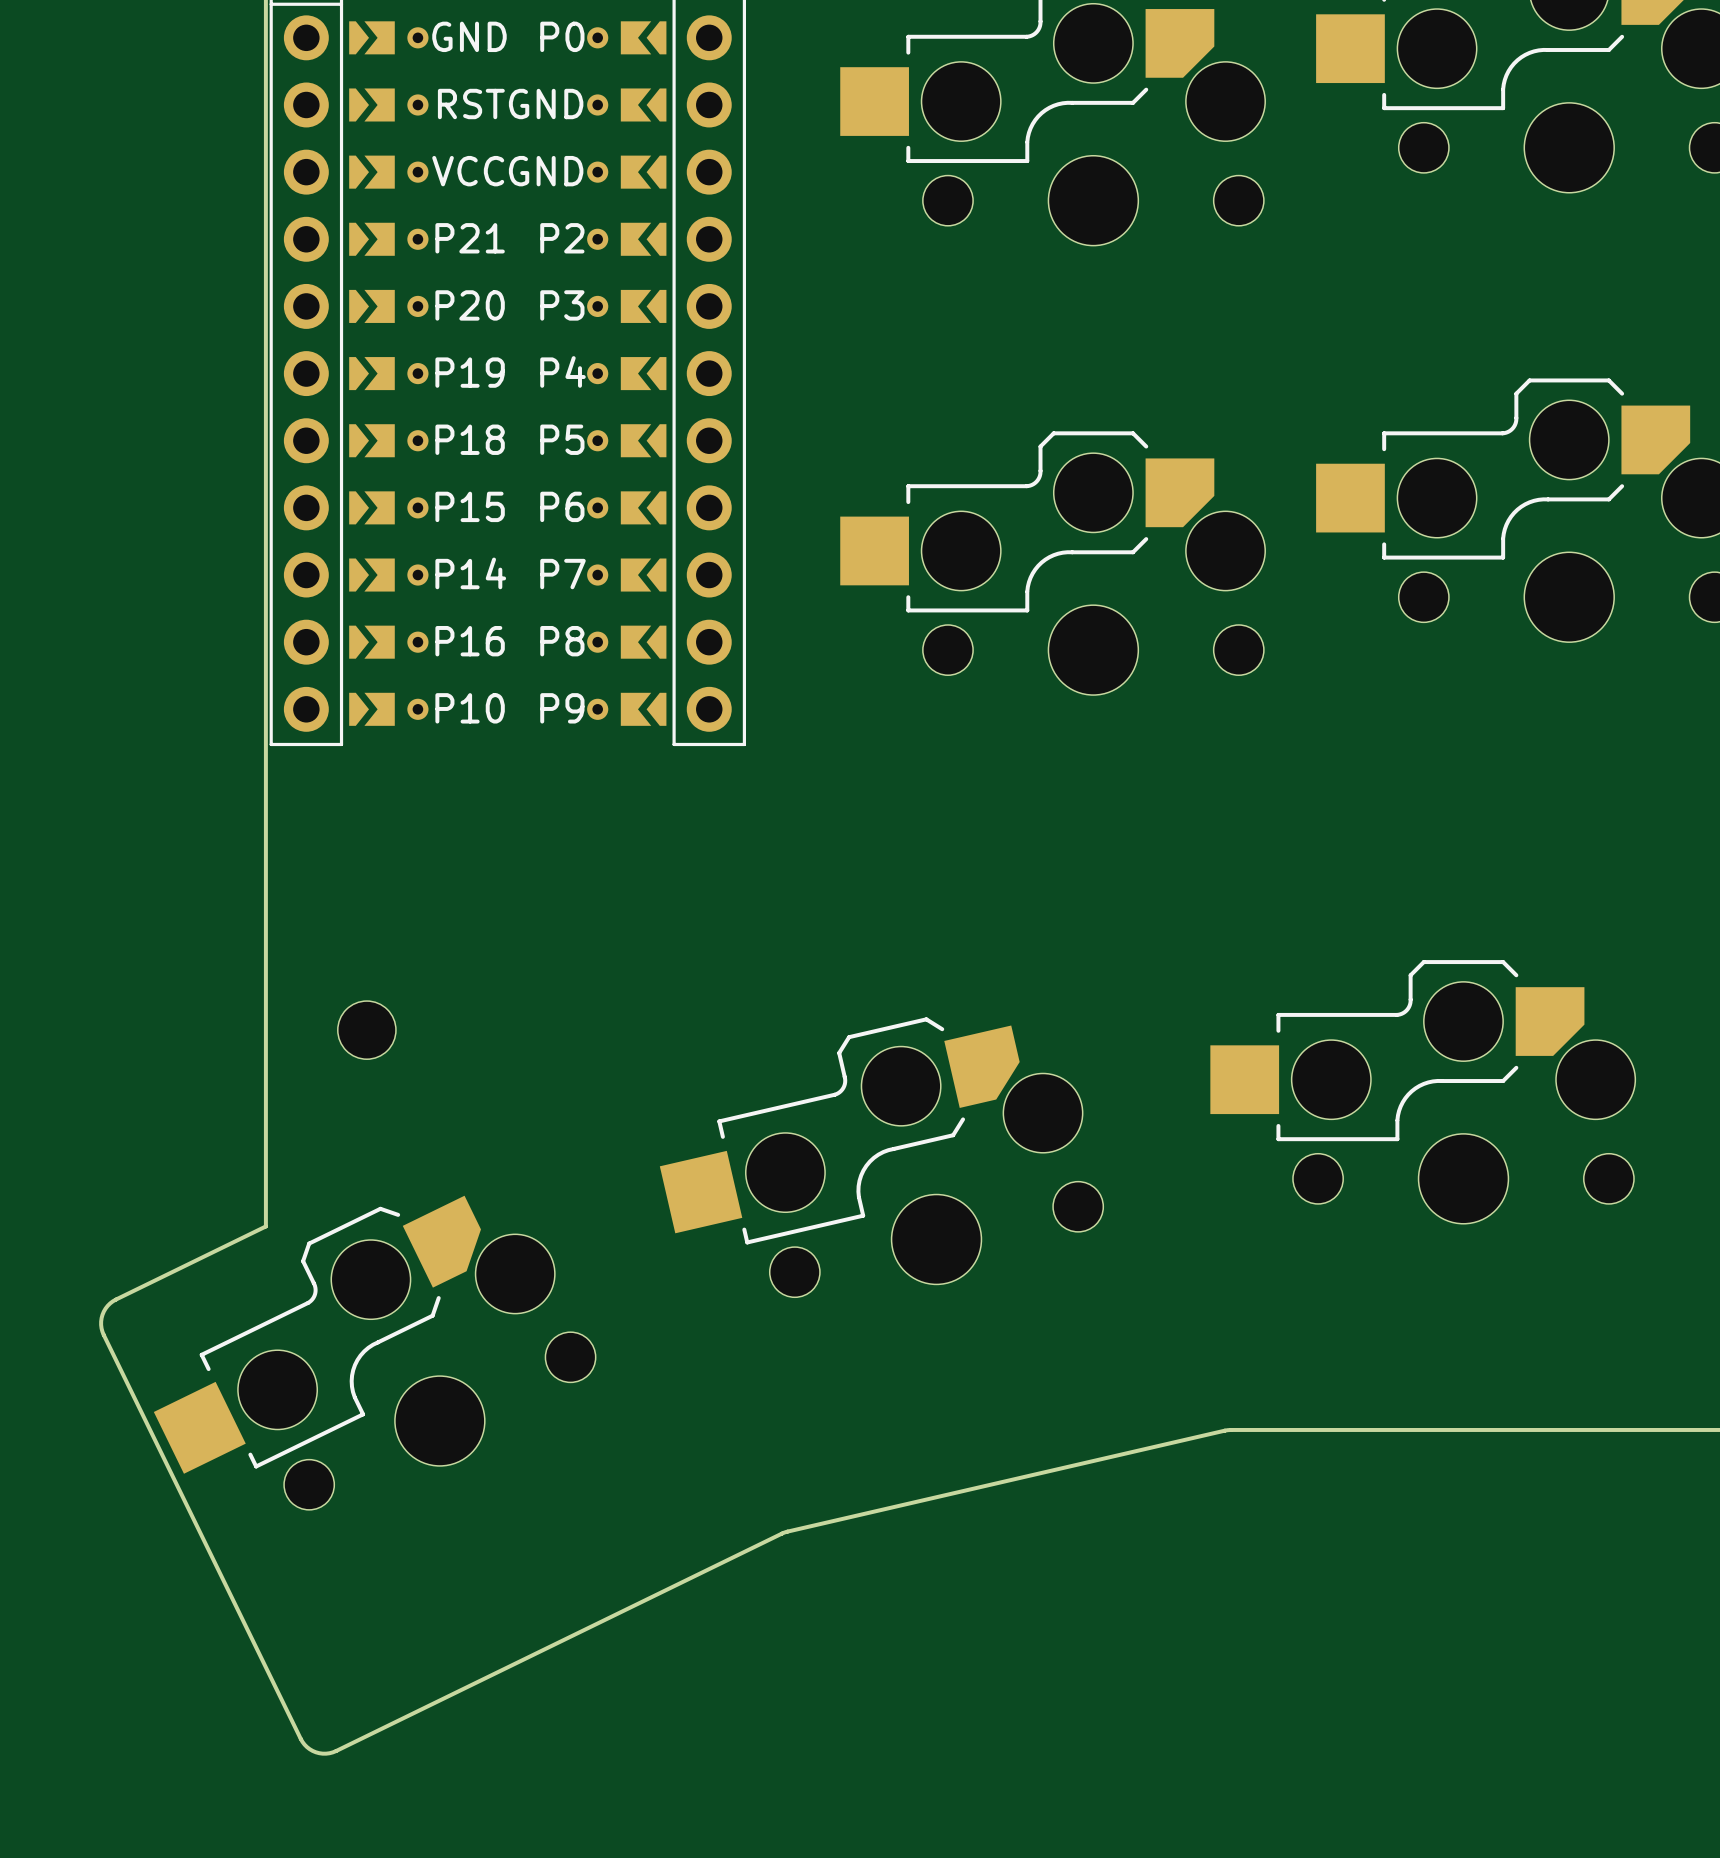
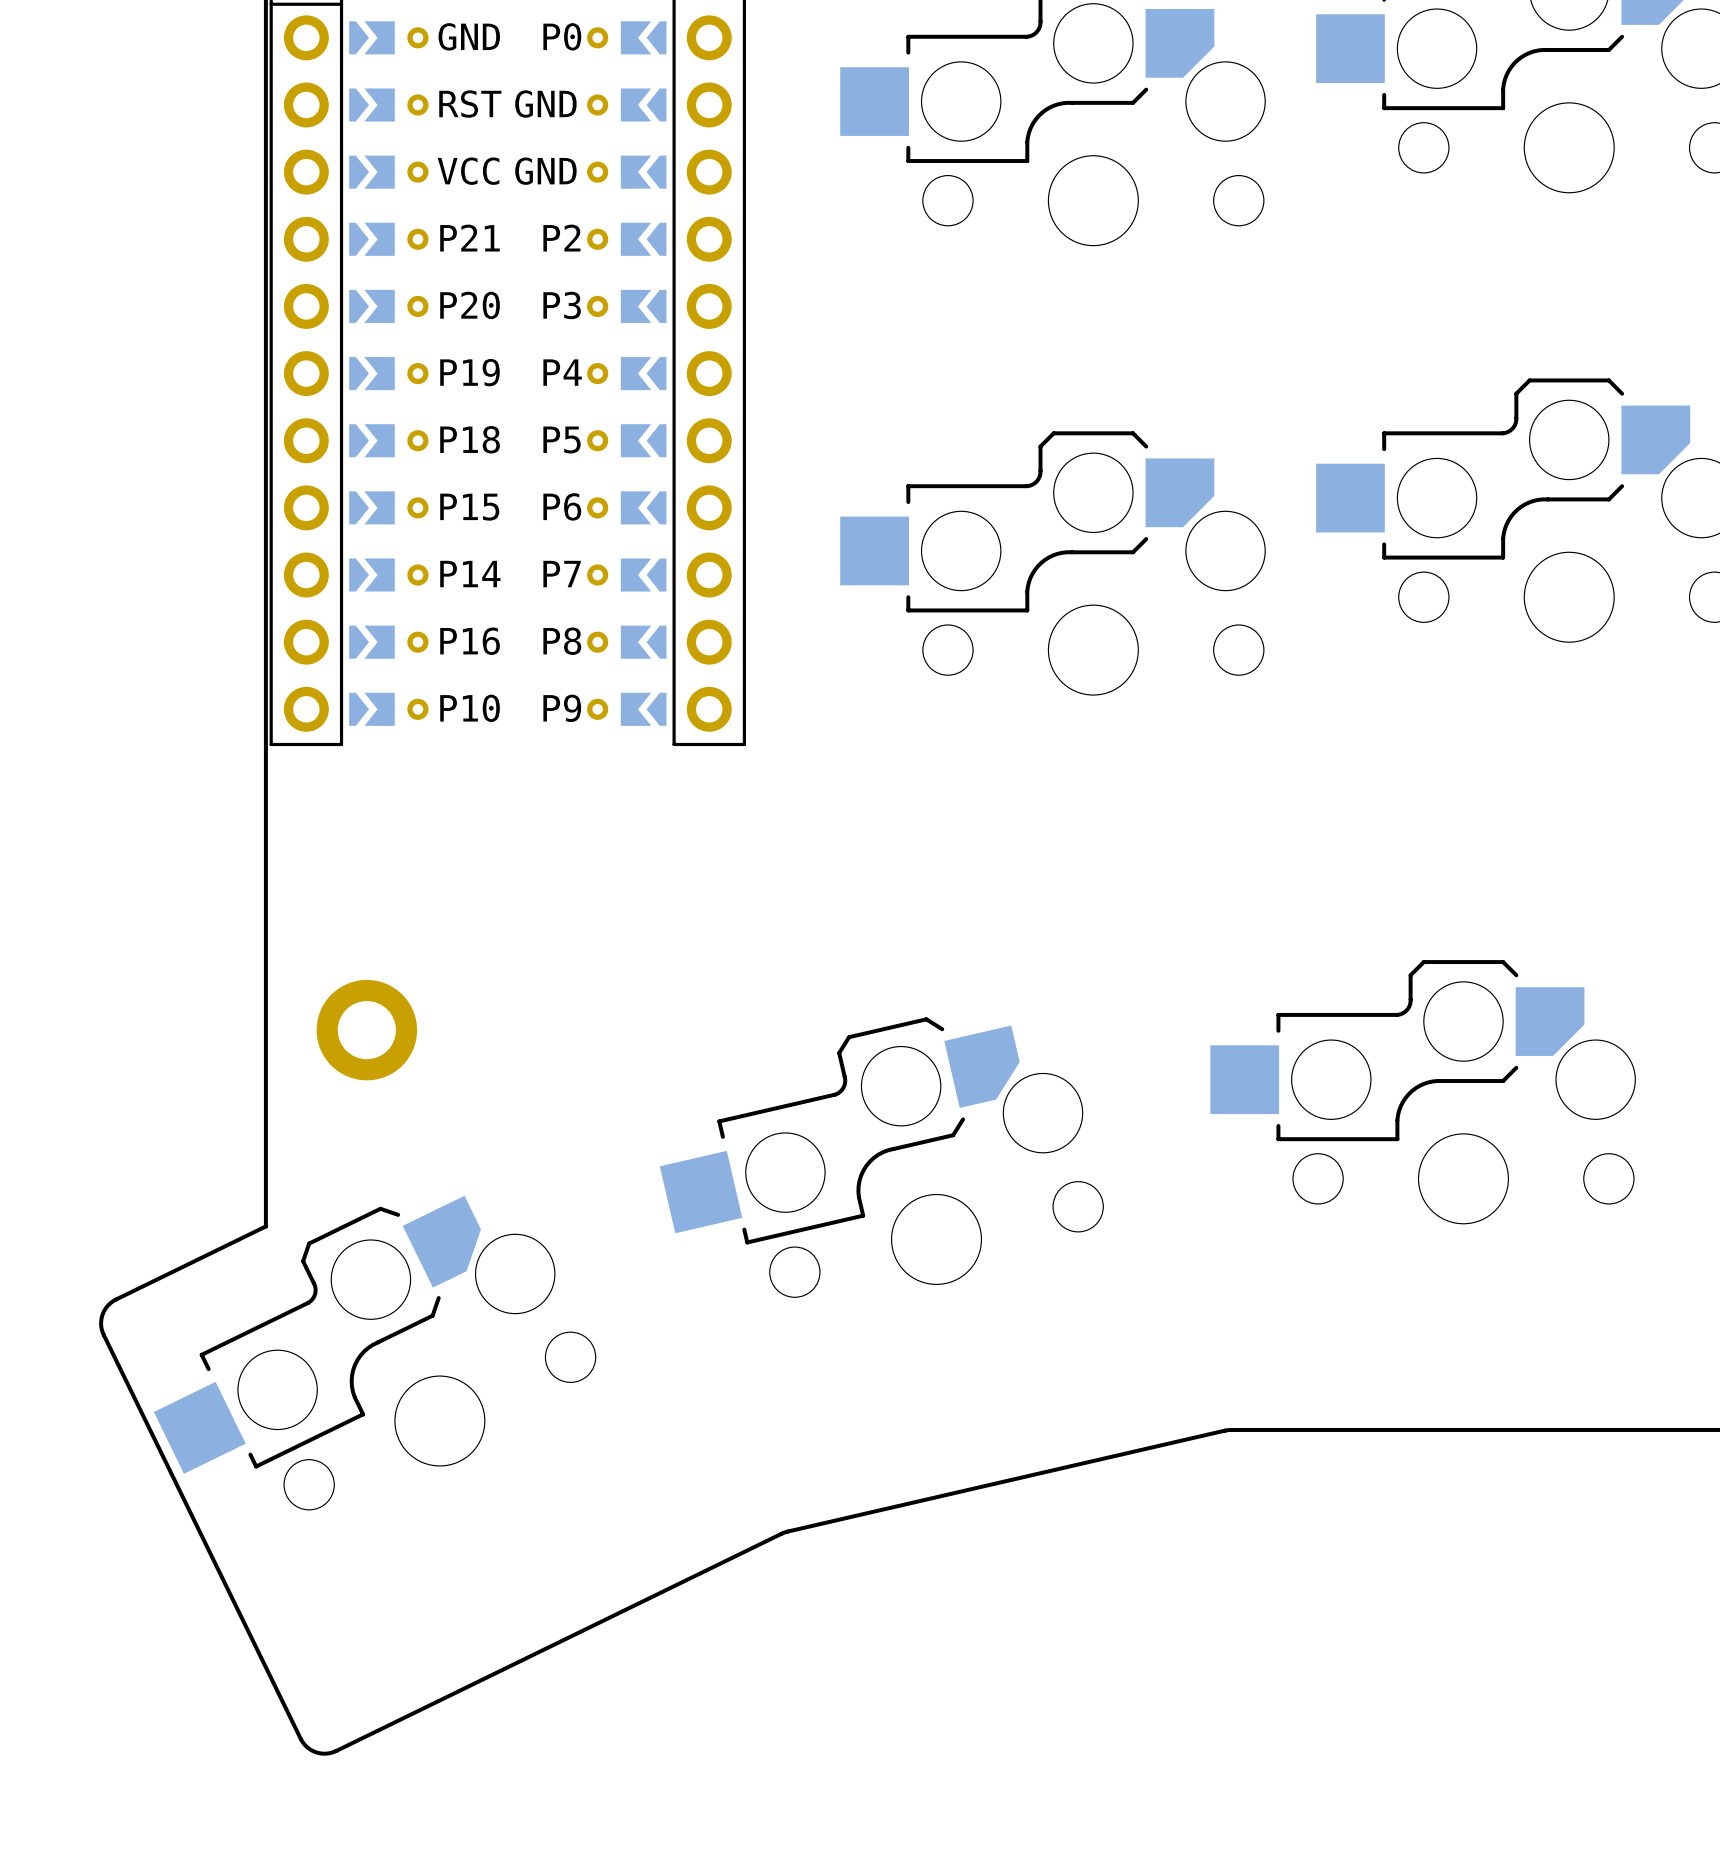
part footprint: [337, 1001, 396, 1060] -> [316, 979, 418, 1081]

